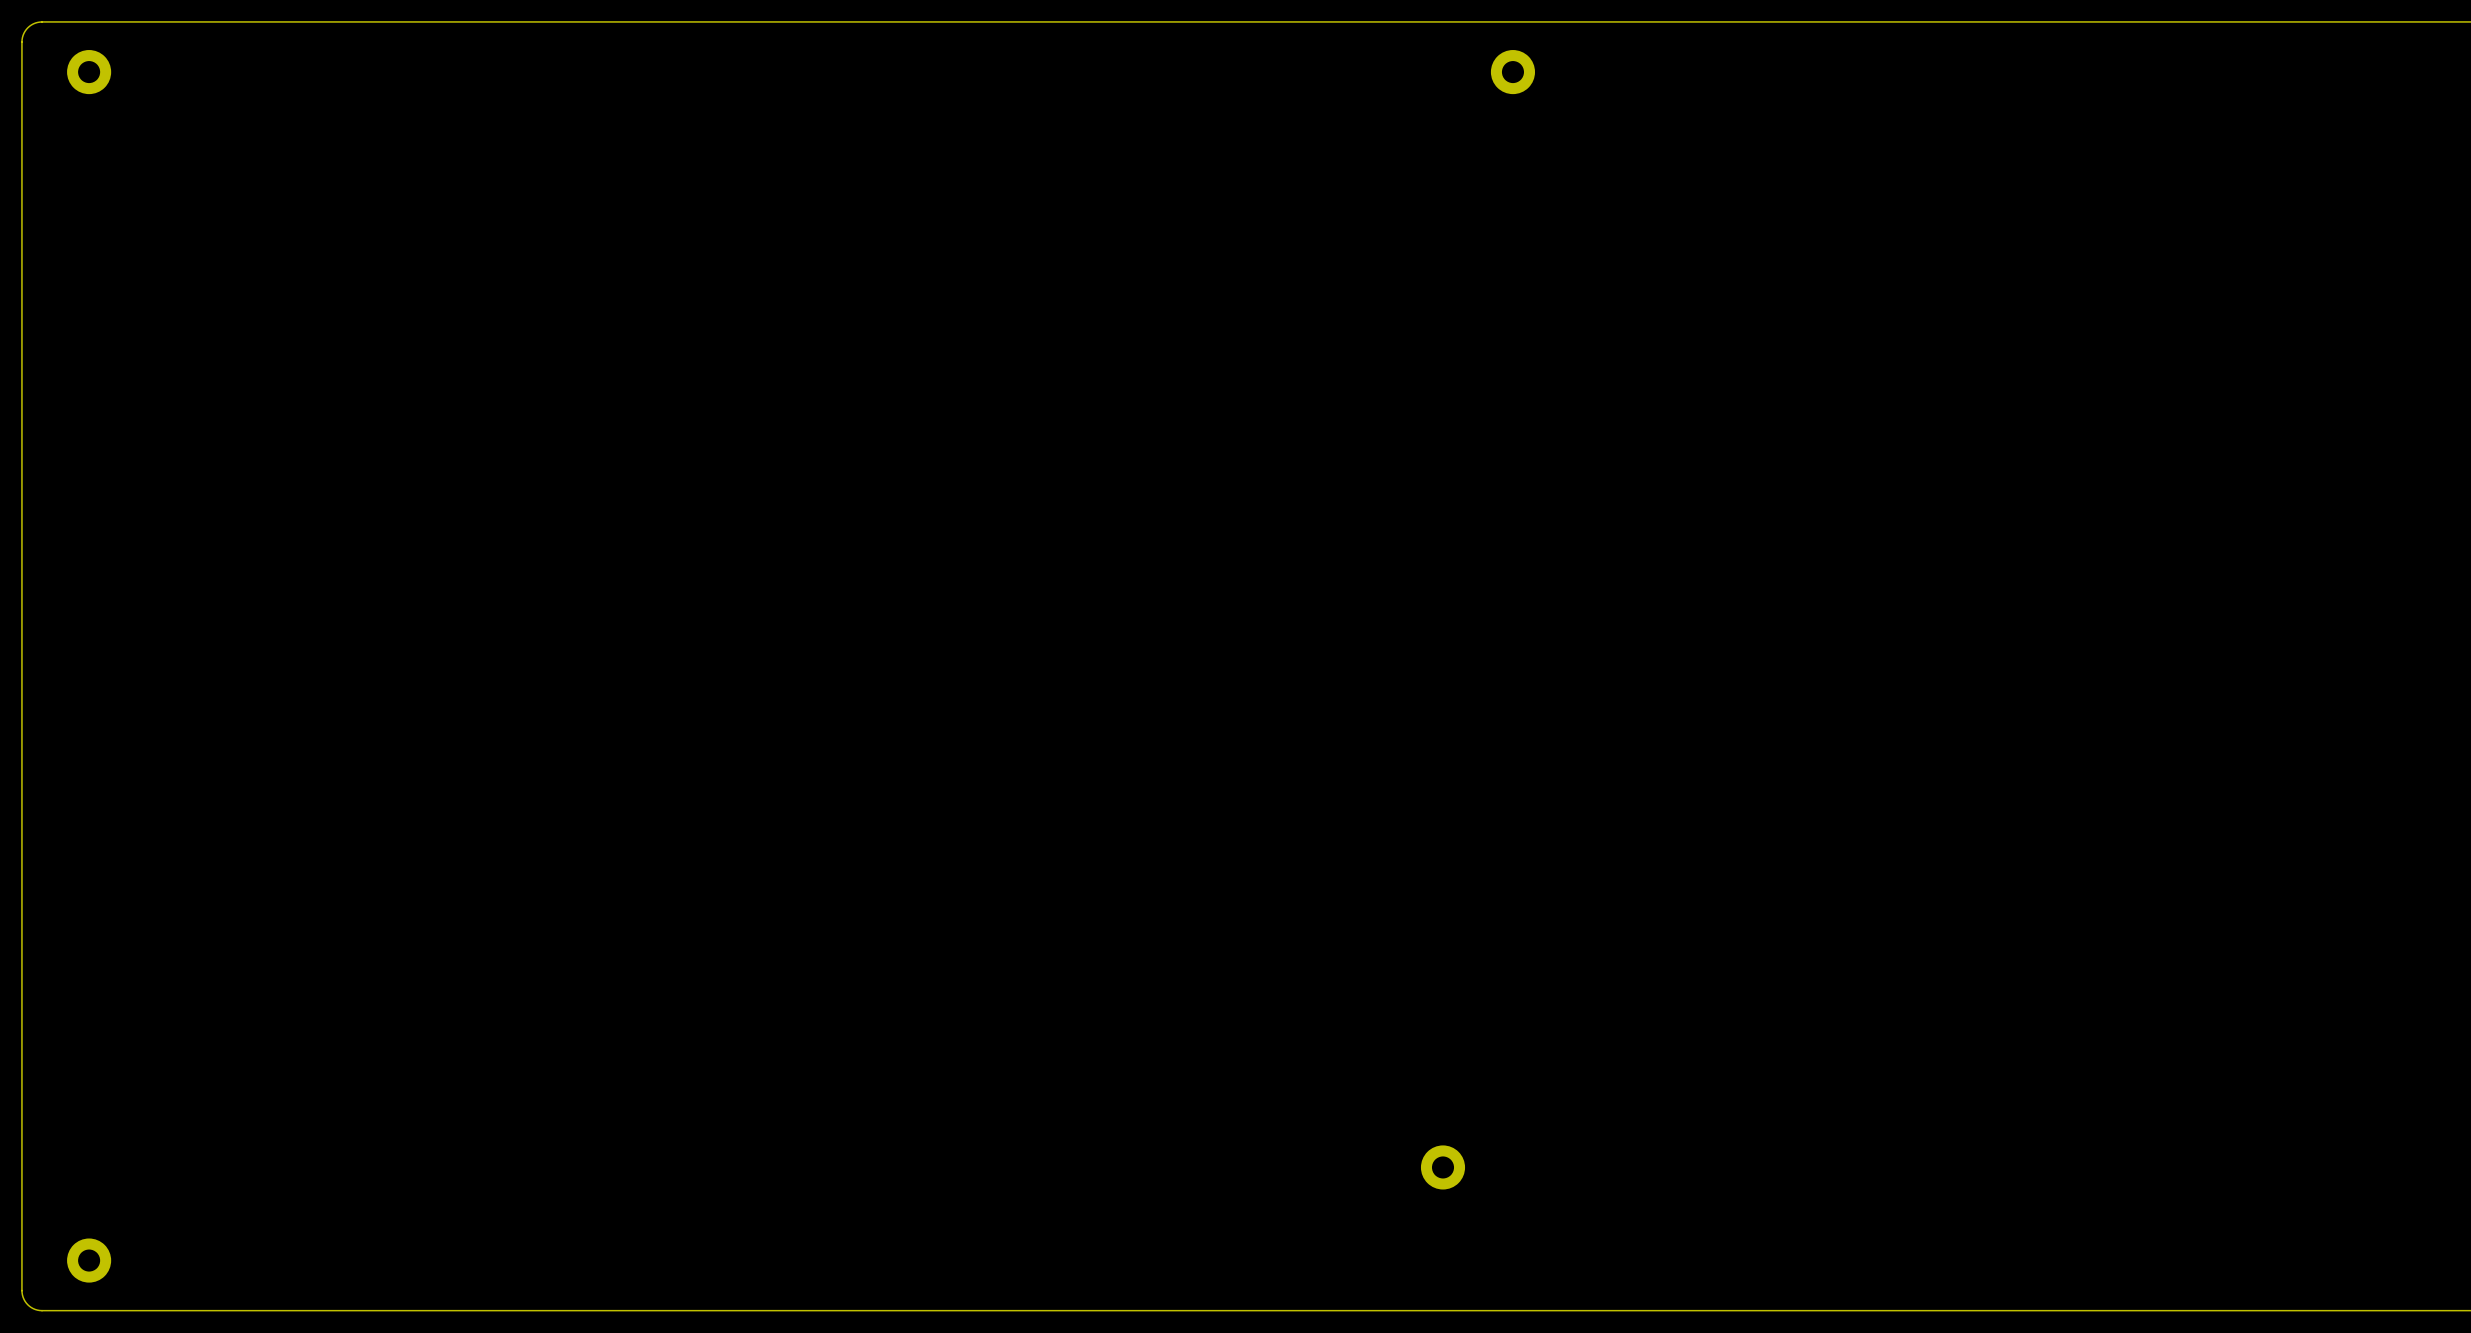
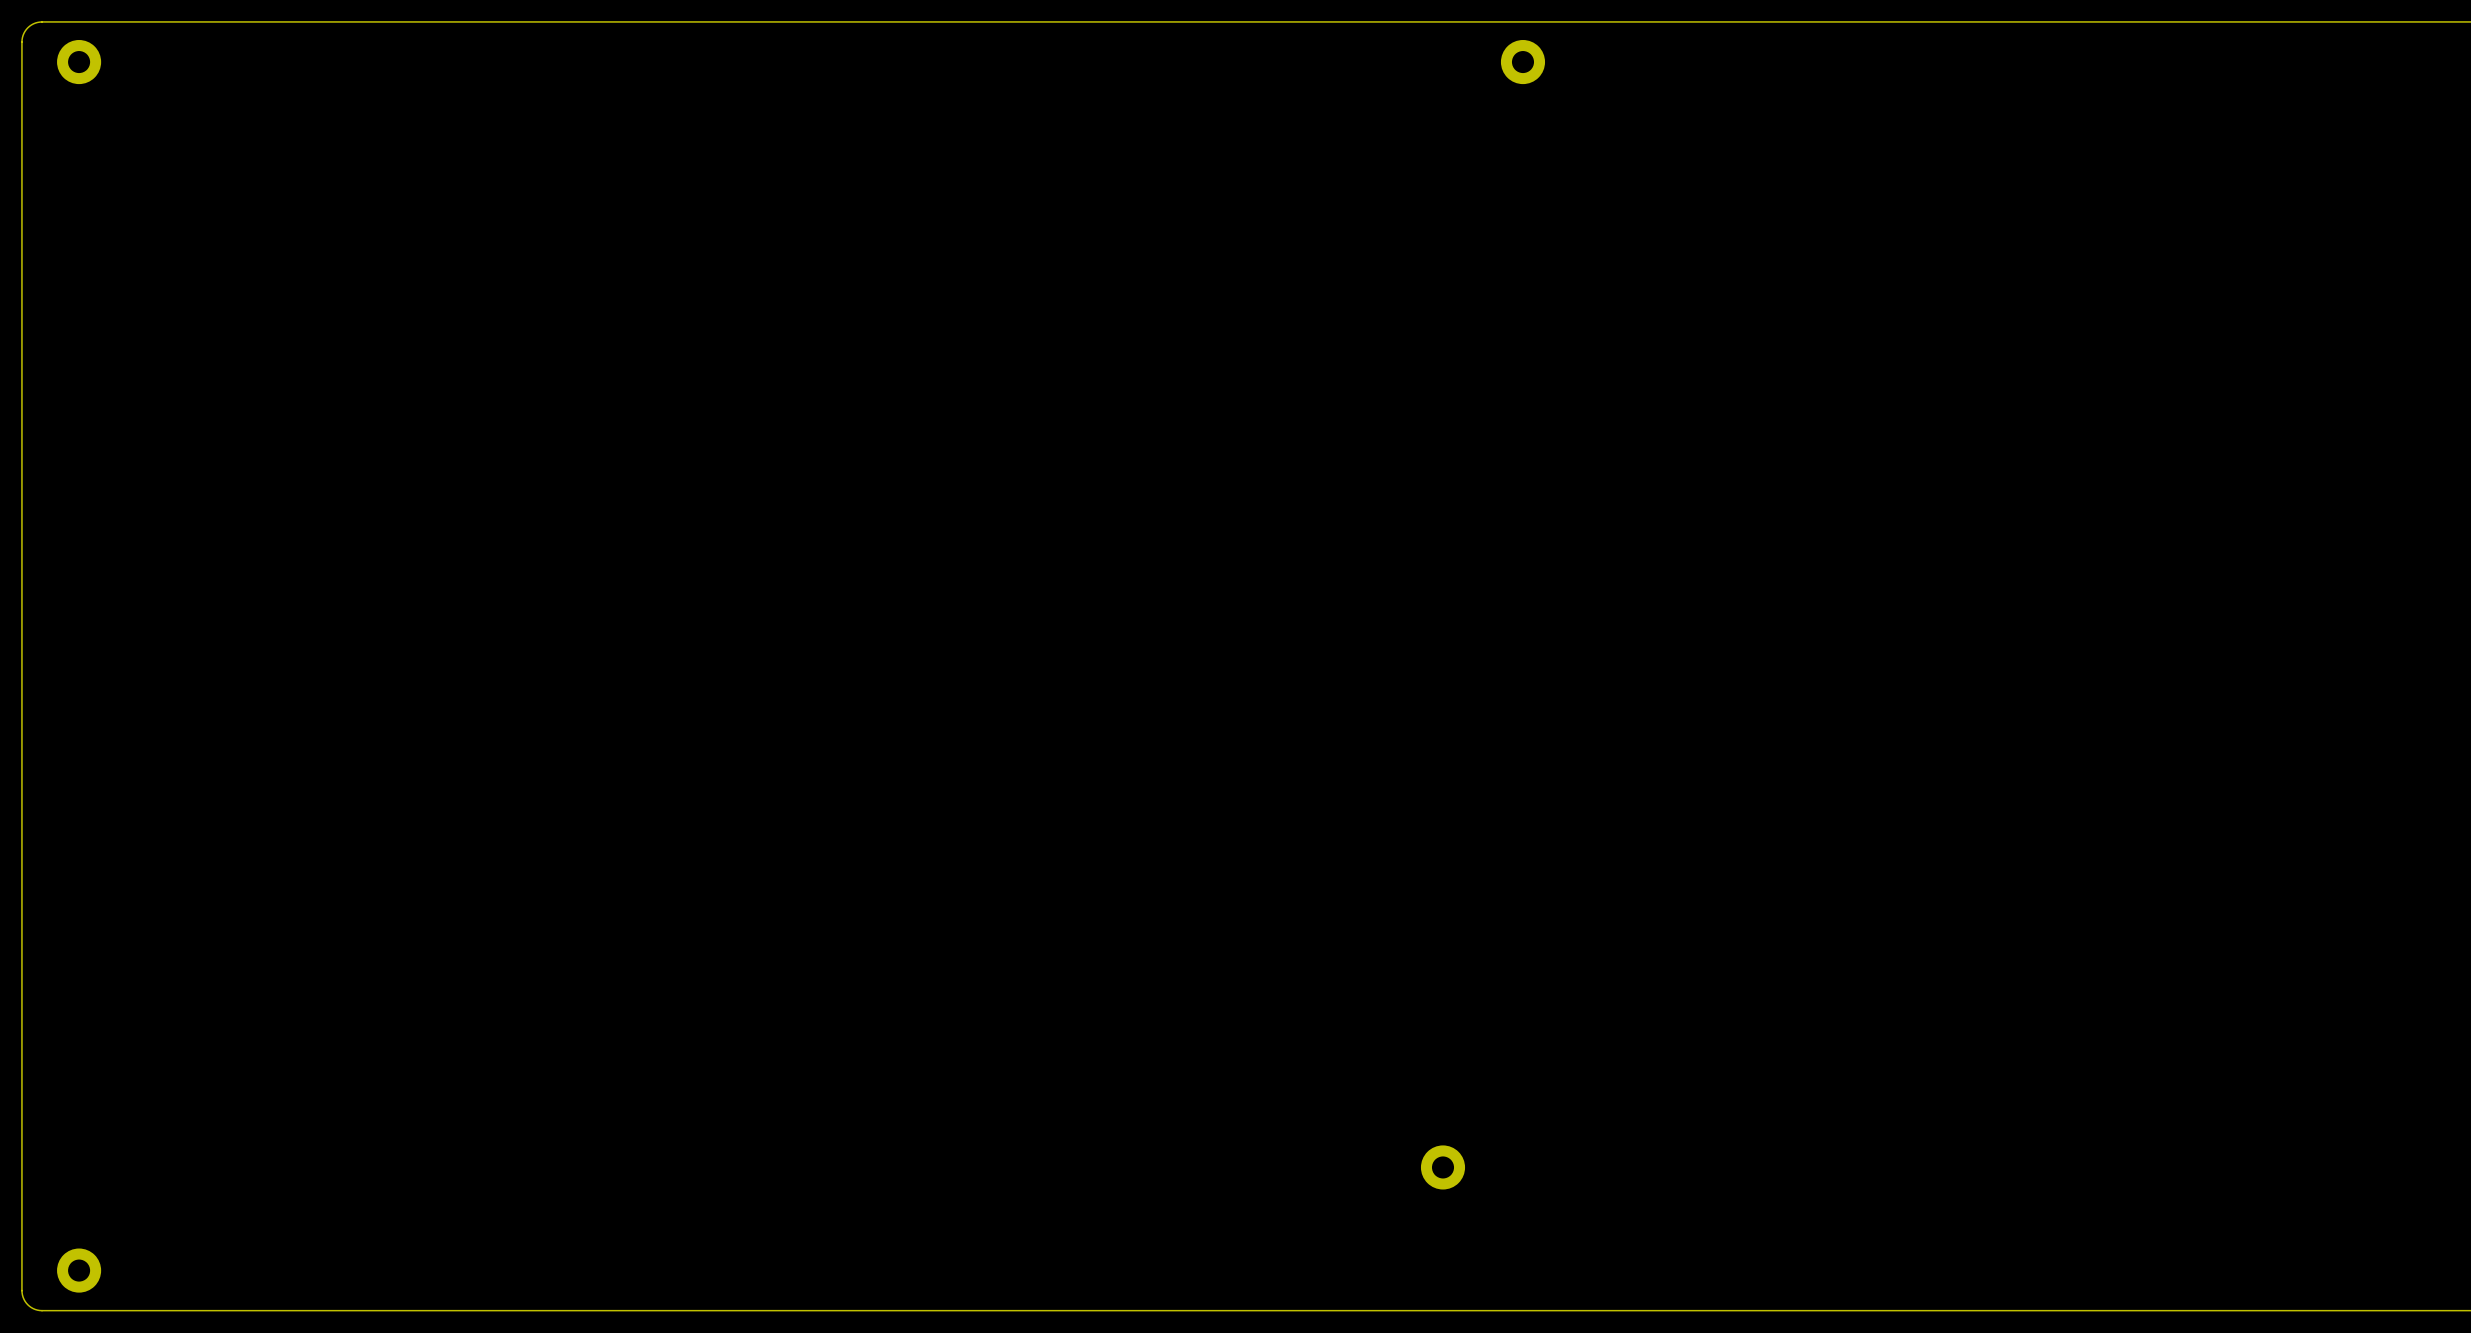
part position: (89, 72) -> (79, 62)
part position: (1512, 72) -> (1522, 62)
part position: (89, 1260) -> (79, 1270)

